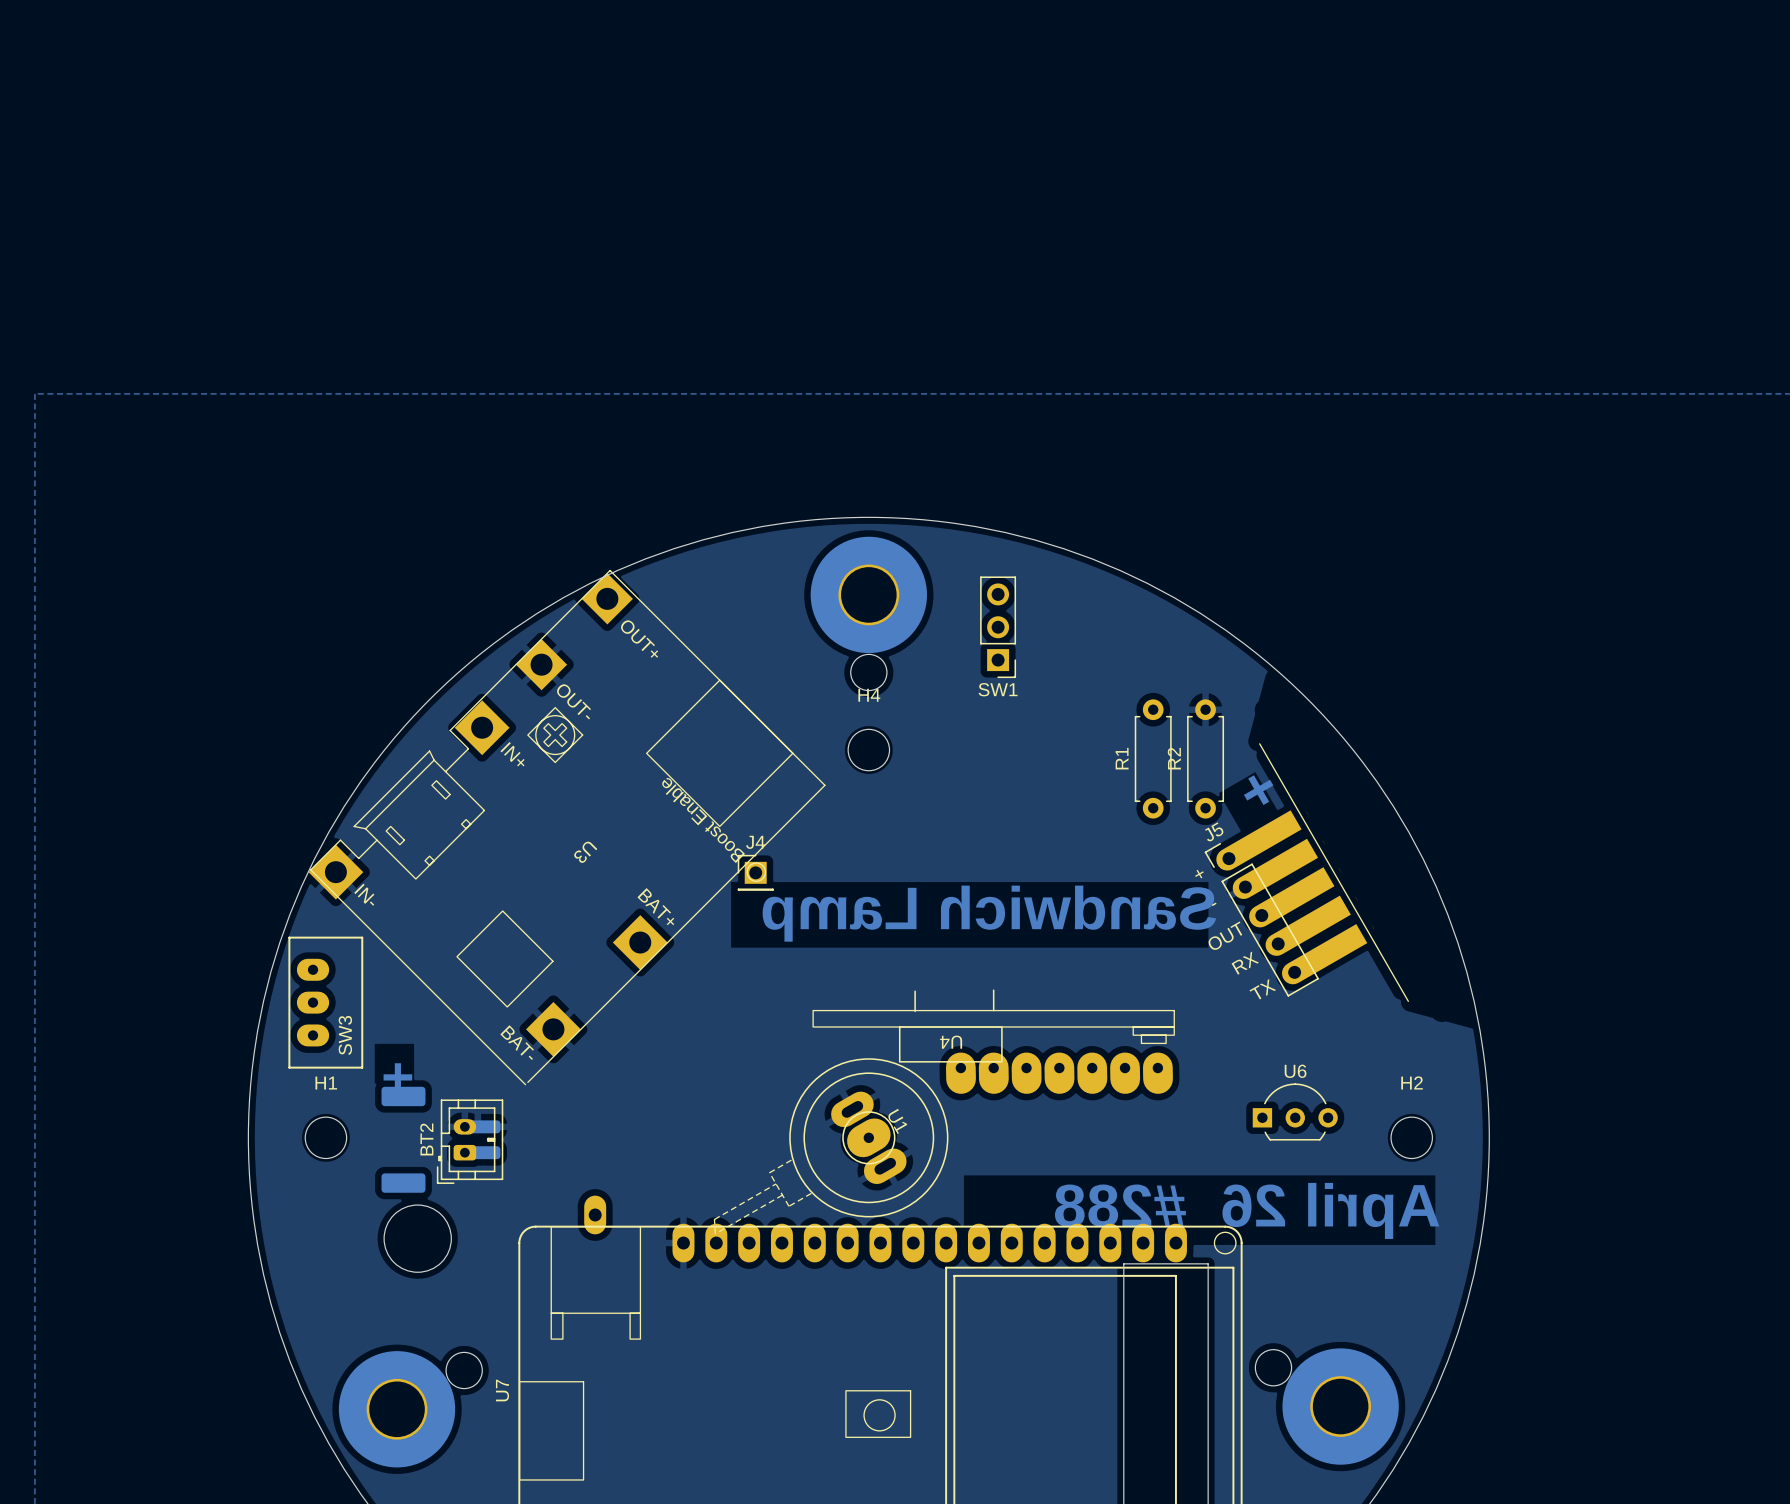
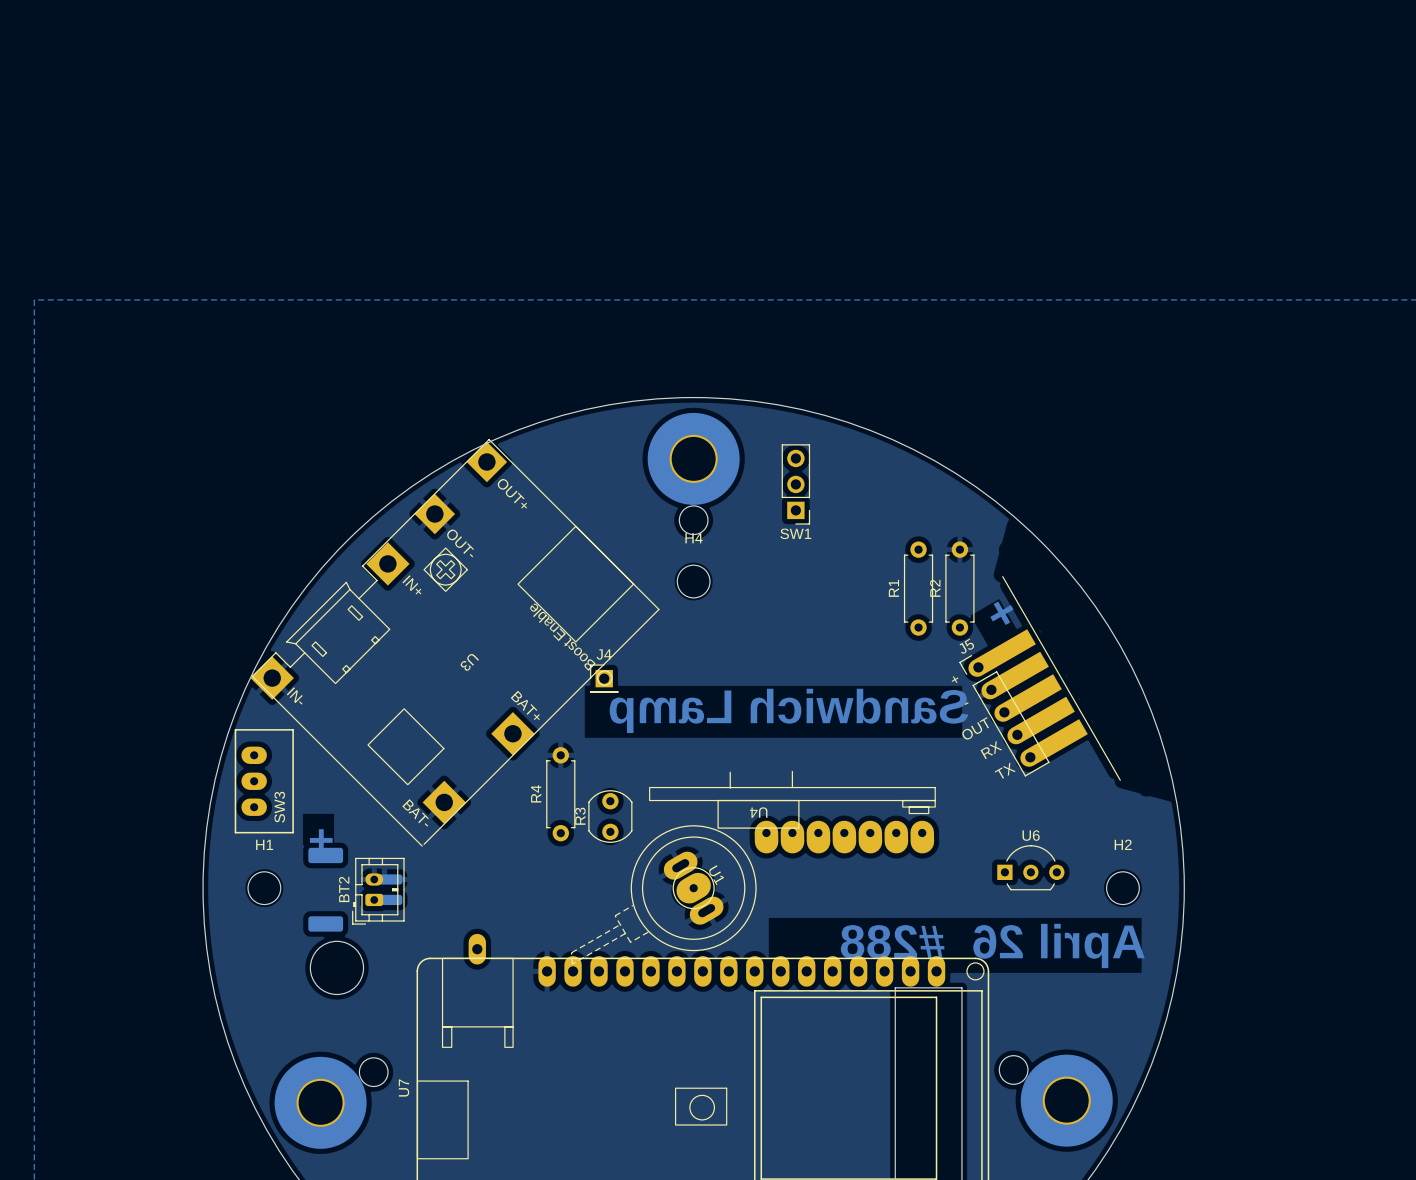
R4: none -> (560, 794)
R3: none -> (610, 816)

